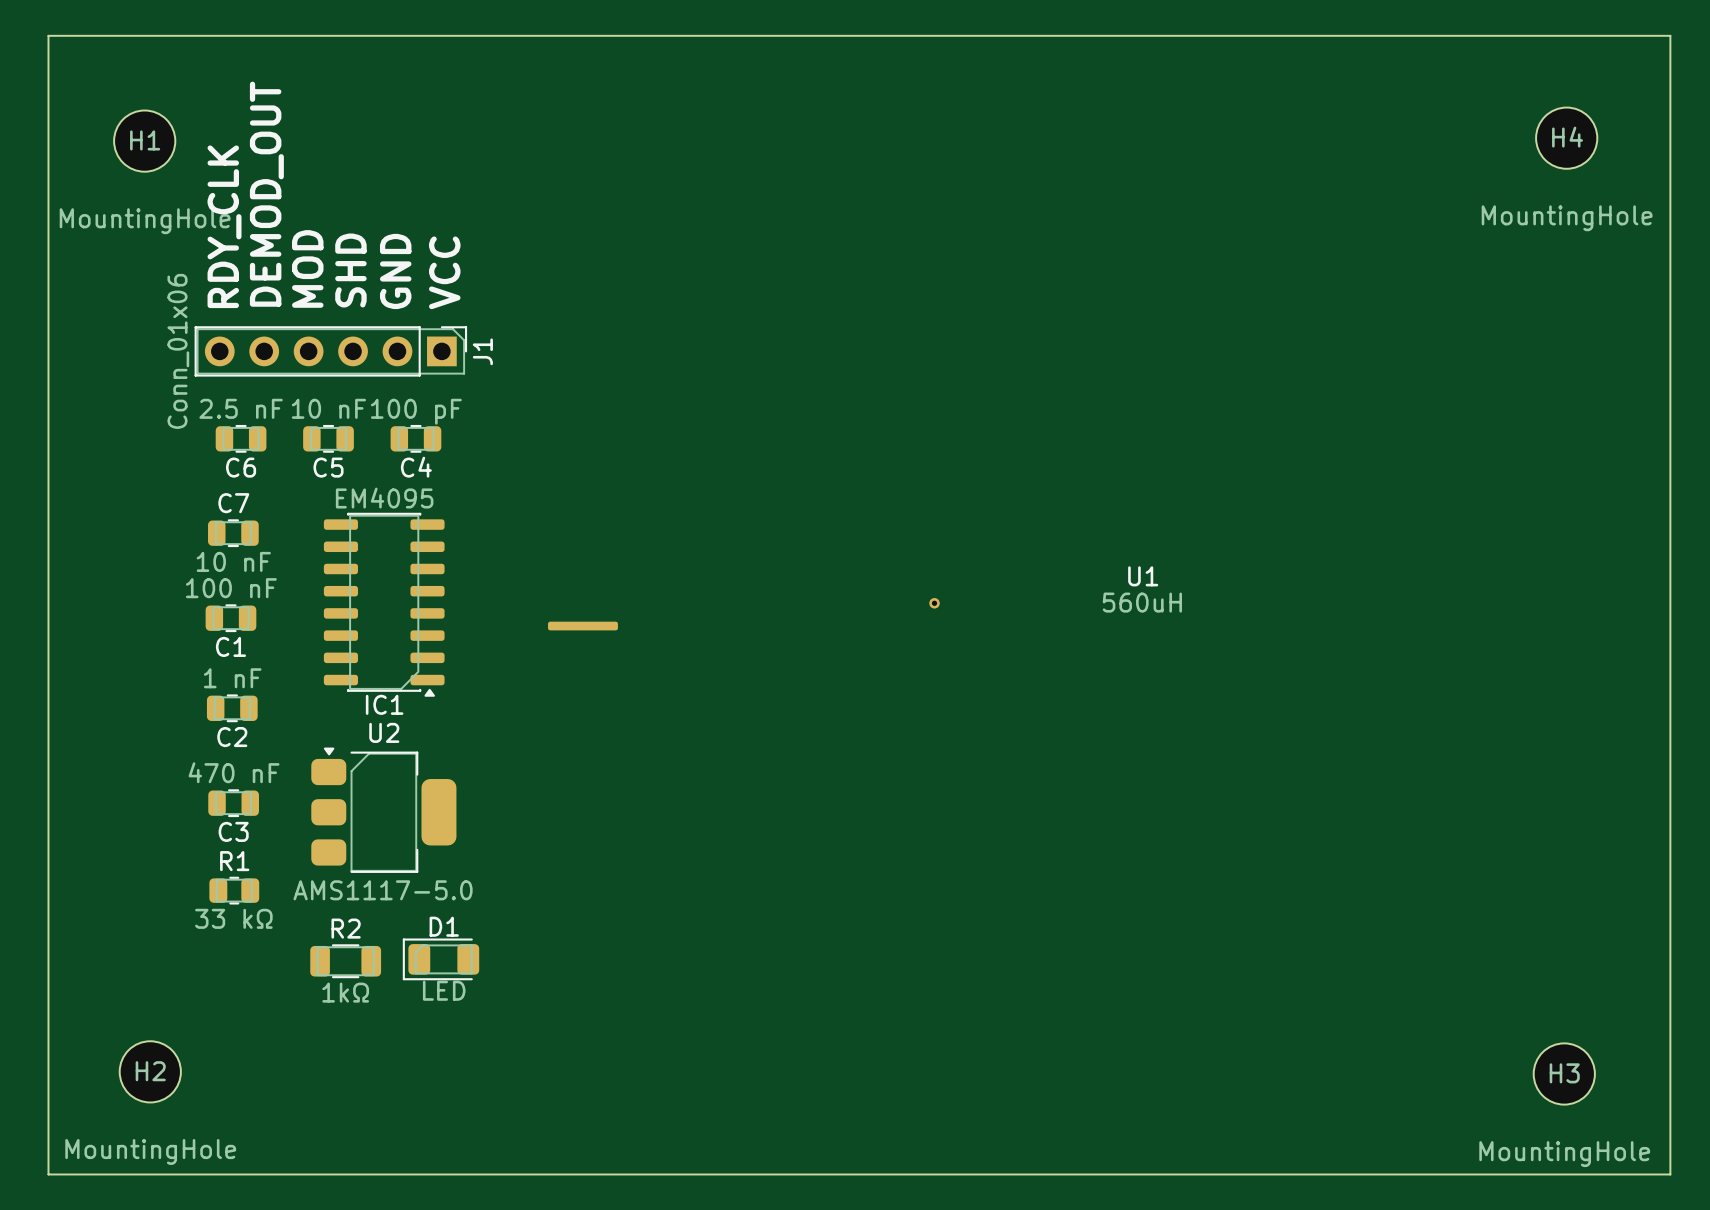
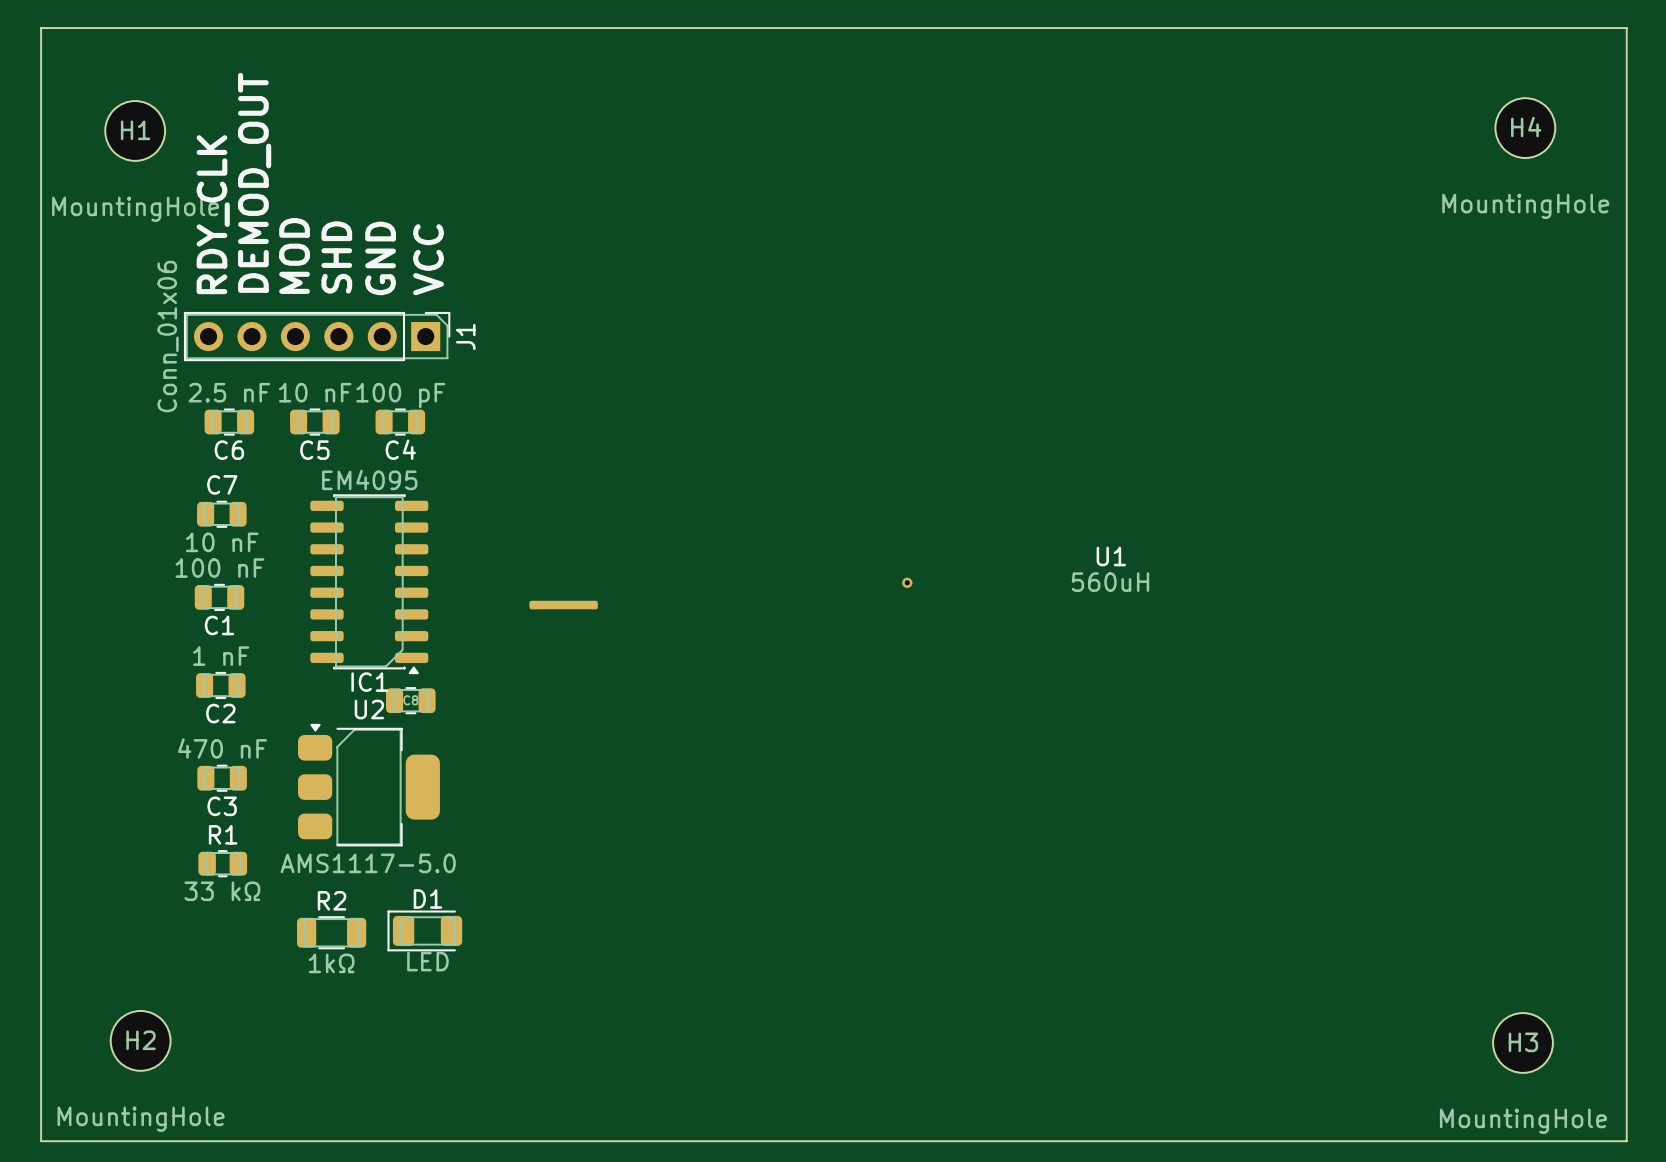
C8: none -> (410, 700)

